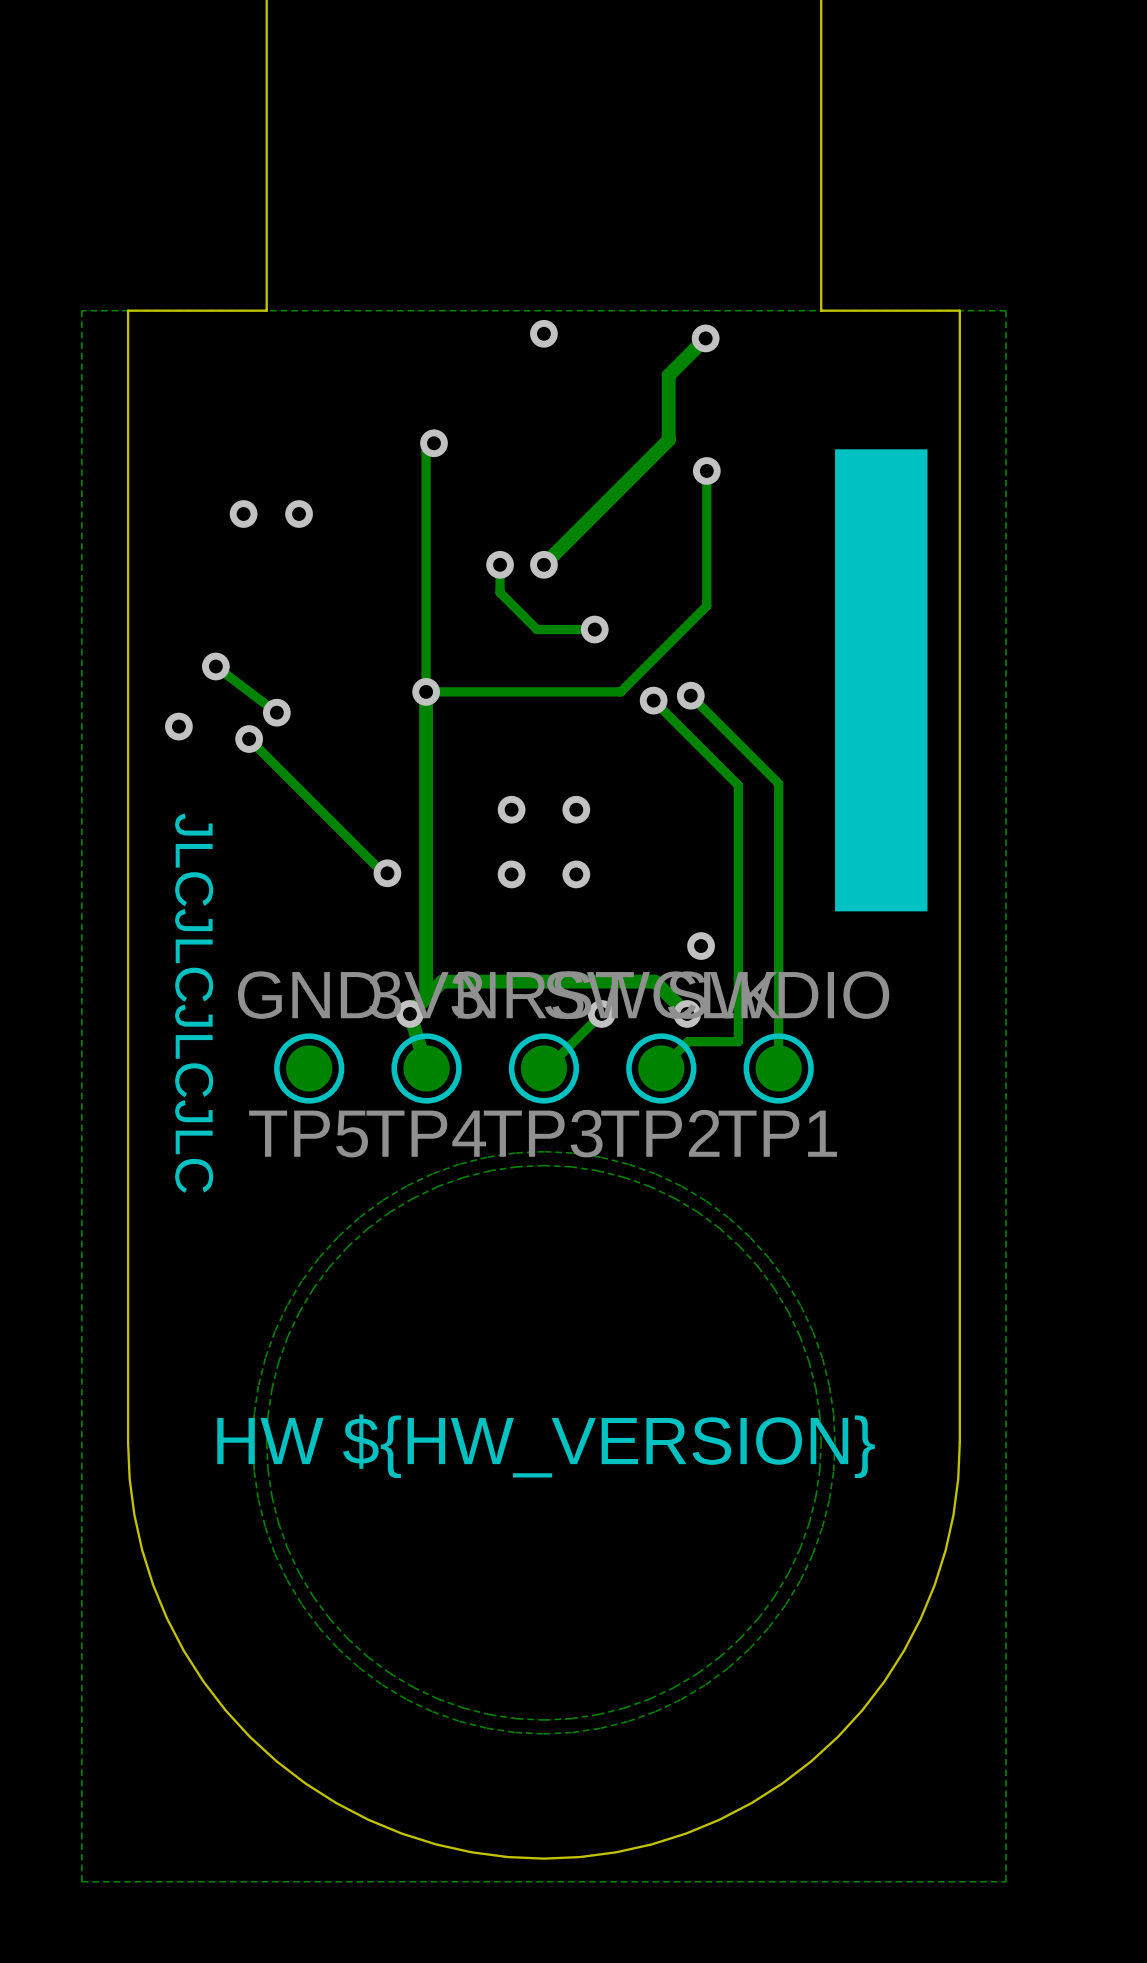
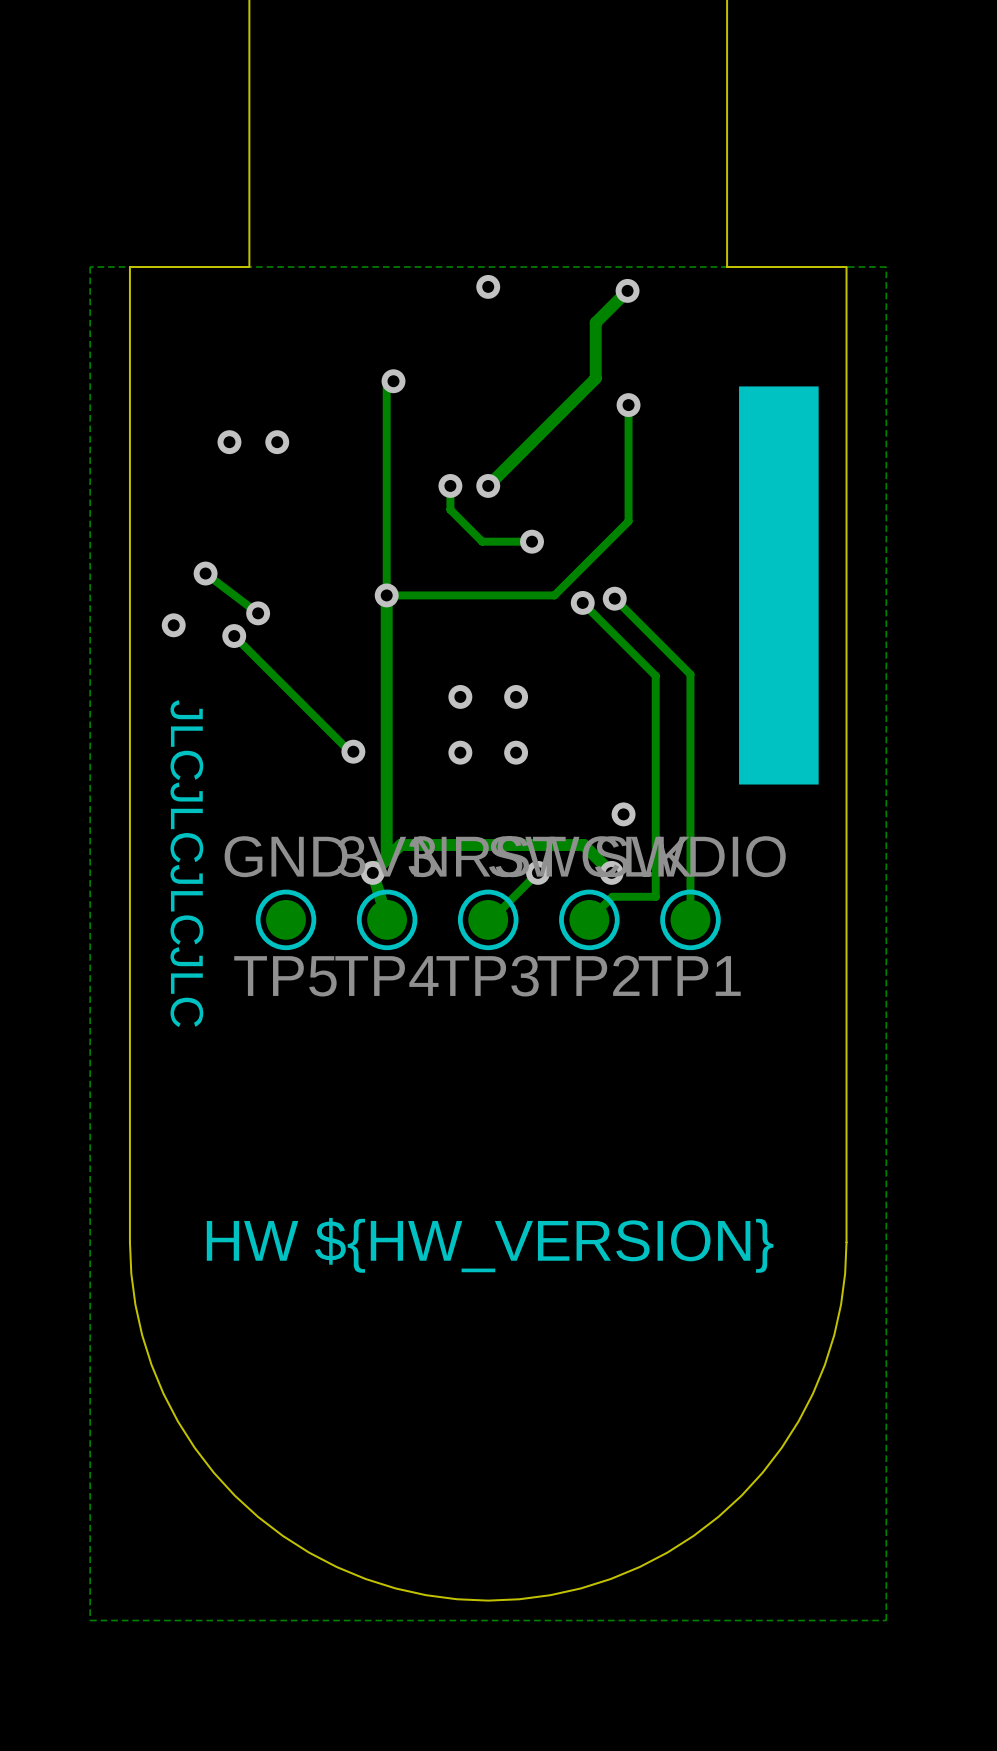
zone outline: (543, 1151) (600, 1157) (655, 1173) (705, 1200) (749, 1236) (785, 1281) (812, 1331) (829, 1385) (835, 1442) (829, 1499) (812, 1554) (785, 1604) (749, 1648) (705, 1684) (655, 1711) (600, 1728) (543, 1733) (487, 1728) (432, 1711) (382, 1684) (338, 1648) (301, 1604) (275, 1554) (258, 1499) (252, 1442) (258, 1385) (275, 1331) (301, 1281) (338, 1236) (382, 1200) (432, 1173) (487, 1157) (543, 1151) -> none
zone outline: (543, 1165) (598, 1170) (650, 1186) (697, 1212) (739, 1246) (774, 1288) (800, 1336) (815, 1388) (821, 1442) (815, 1496) (800, 1548) (774, 1596) (739, 1638) (697, 1673) (650, 1698) (598, 1714) (543, 1720) (489, 1714) (437, 1698) (389, 1673) (347, 1638) (313, 1596) (287, 1548) (272, 1496) (266, 1442) (272, 1388) (287, 1336) (313, 1288) (347, 1246) (389, 1212) (437, 1186) (489, 1170) (543, 1165) -> none

